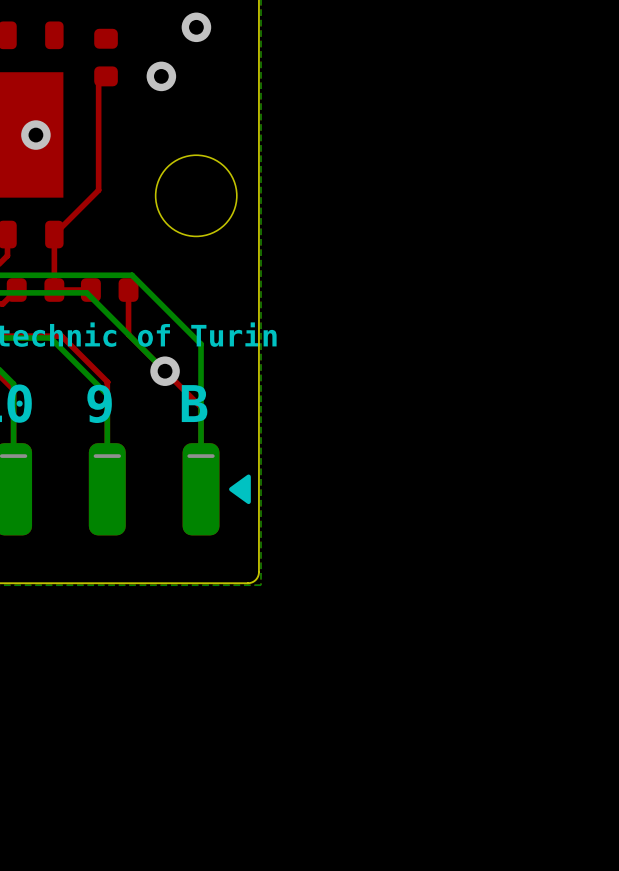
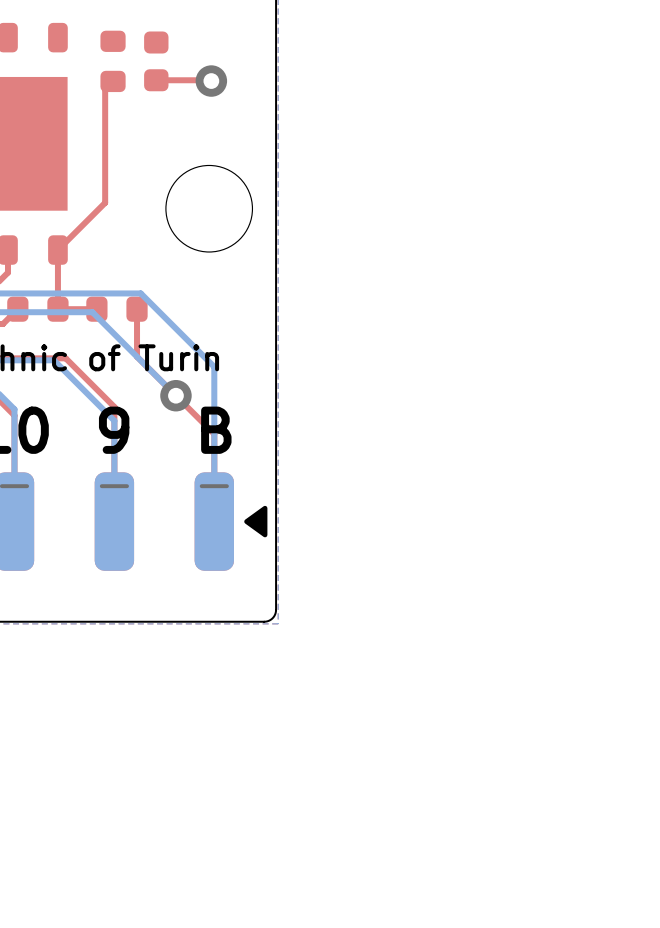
via: (196, 27) -> none
part: none -> (156, 61)
top track: none -> (156, 80) (211, 81)
via: (161, 76) -> none
via: none -> (211, 81)
via: (35, 135) -> none

